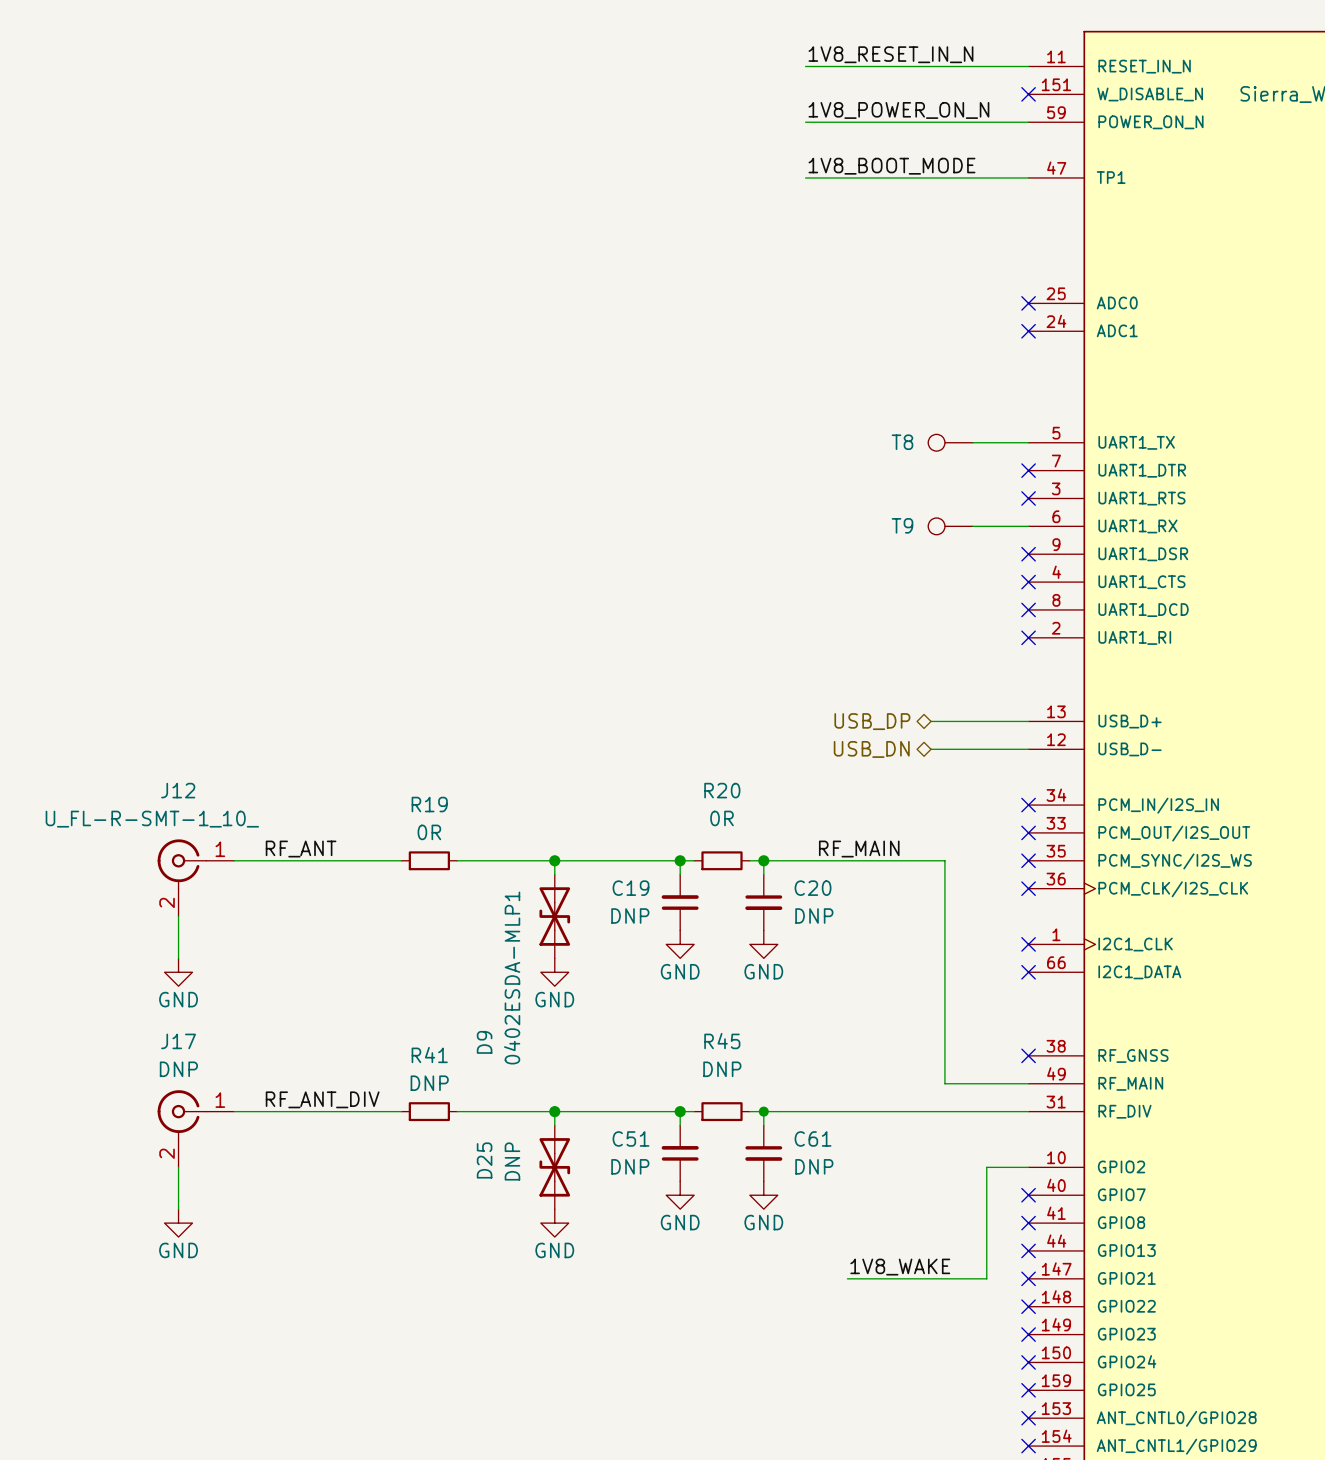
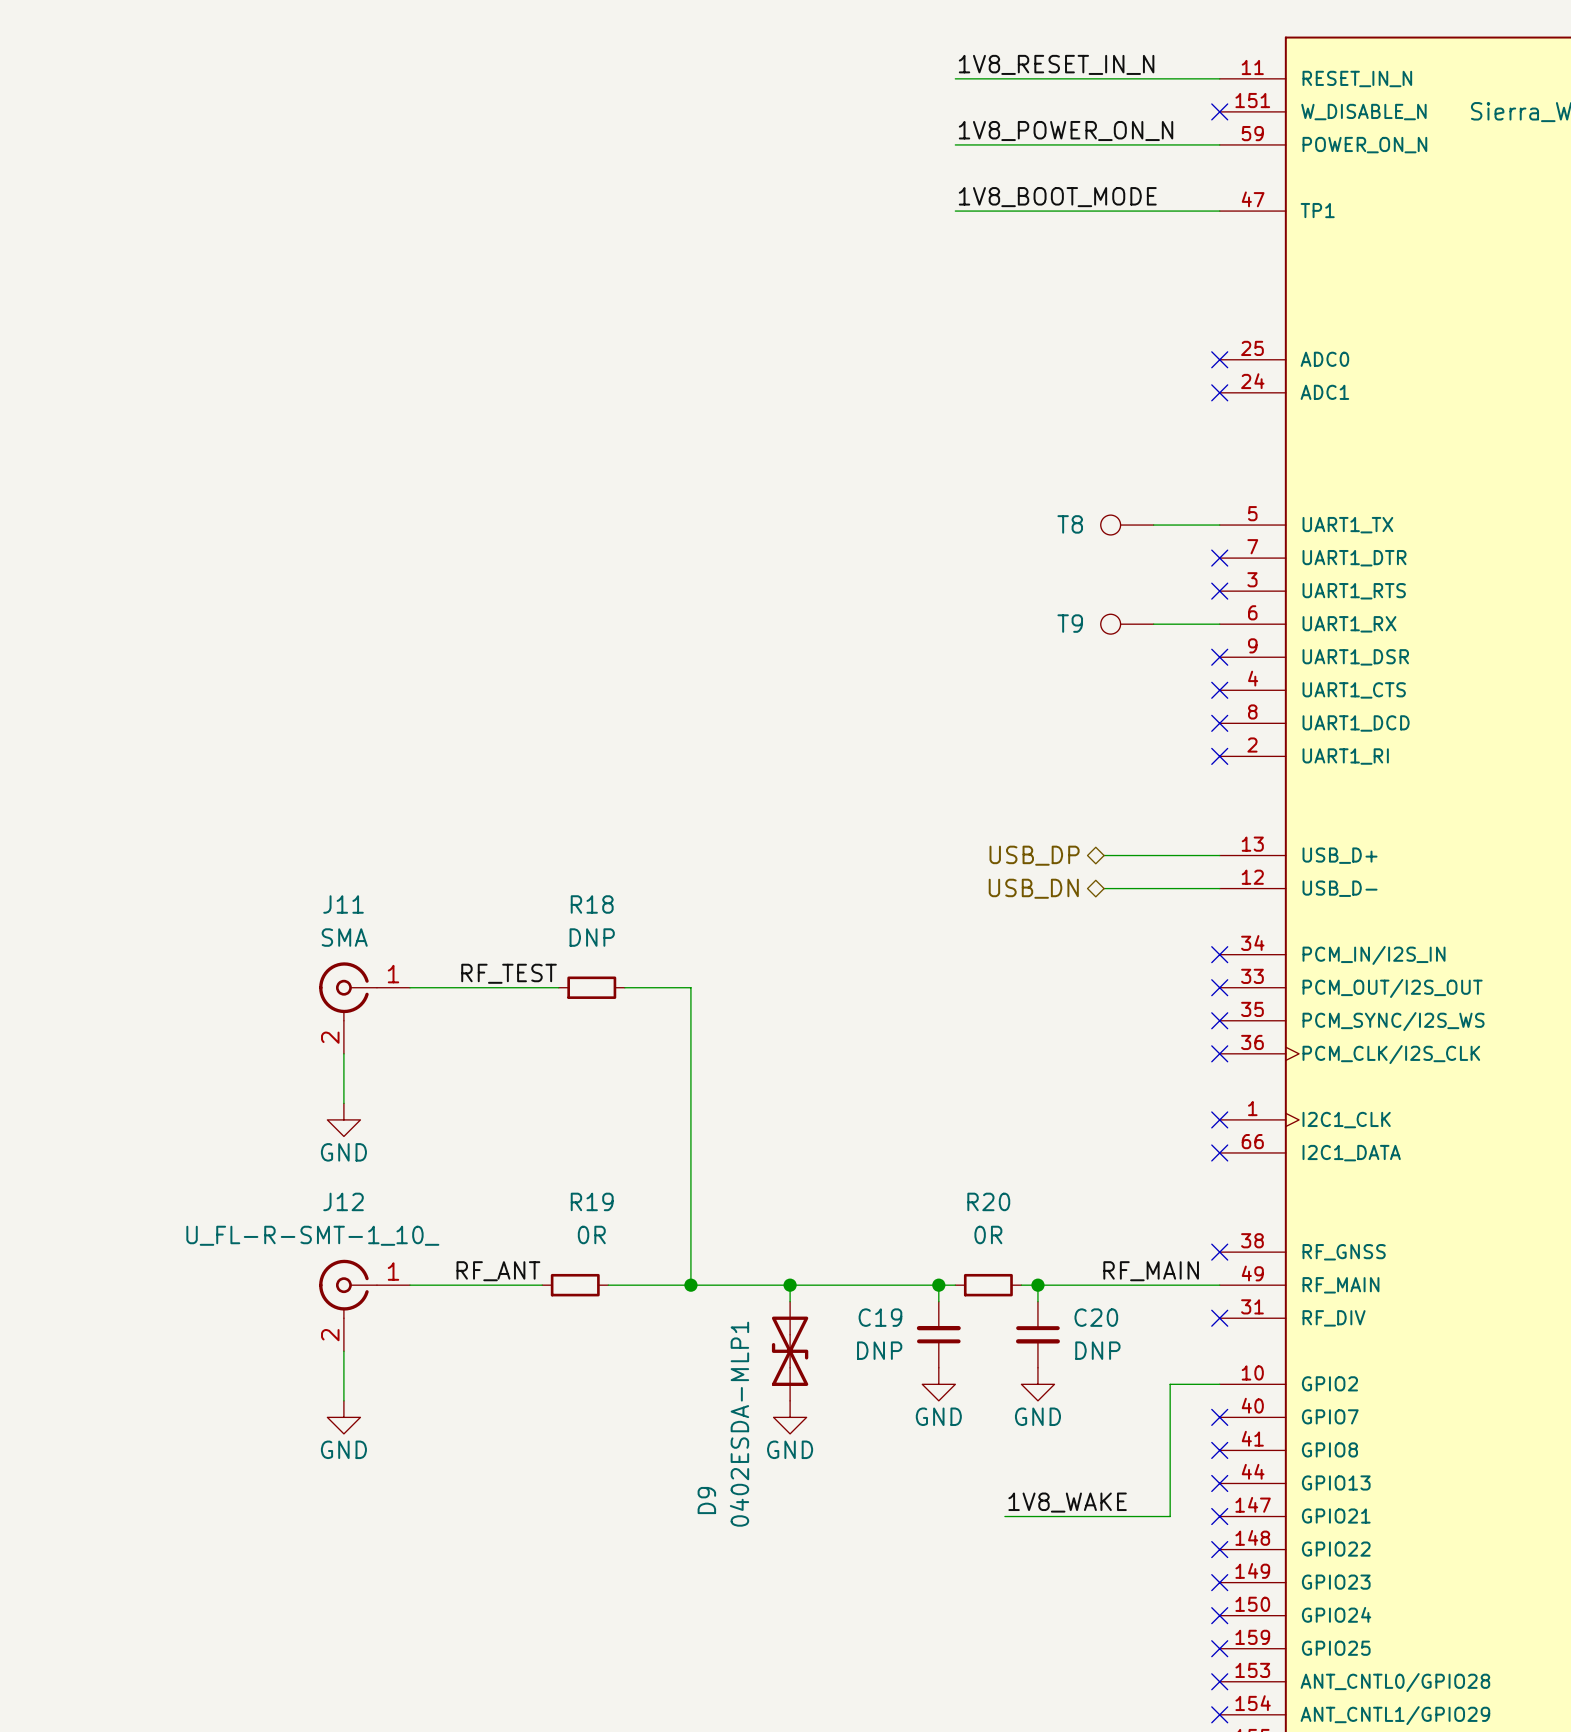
R19 name position: R19 (429, 804) -> R19 (592, 1201)
label: none -> RF_TEST (509, 973)
wire: none -> (410, 987) (558, 987)
R19 value position: 0R (429, 832) -> 0R (591, 1234)
R18: none -> DNP (591, 987)
wire: none -> (624, 987) (690, 987) (690, 1285)
label: RF_ANT (301, 849) -> none
label position: RF_MAIN (859, 849) -> RF_MAIN (1151, 1271)
J11: none -> SMA (364, 1008)
wire: (234, 860) (401, 860) -> none
R19 position: (429, 860) -> (575, 1285)
wire: (457, 860) (694, 860) -> none
wire: (554, 860) (554, 874) -> none
junction: (554, 860) -> none
wire: (680, 860) (680, 874) -> none
junction: (680, 860) -> none
R20 position: (722, 860) -> (988, 1285)
wire: (749, 860) (944, 860) (944, 1083) -> (1021, 1285) (1120, 1285)
wire: (763, 860) (763, 874) -> none
junction: (763, 860) -> none
J12 position: (195, 877) -> (364, 1305)
C19 position: (680, 902) -> (938, 1334)
C20 position: (763, 902) -> (1037, 1334)
wire: (178, 916) (178, 958) -> (343, 1053) (343, 1103)
D9 position: (554, 916) -> (790, 1351)
power symbol: GND (680, 944) -> none
power symbol: GND (763, 944) -> none
power symbol position: GND (178, 972) -> GND (343, 1119)
power symbol: GND (554, 972) -> none
wire: none -> (410, 1285) (542, 1285)
wire: none -> (608, 1285) (955, 1285)
junction: none -> (938, 1285)
junction: none -> (1037, 1285)
label: RF_ANT_DIV (322, 1099) -> RF_ANT (498, 1271)
wire: (234, 1111) (401, 1111) -> none
R41: DNP (429, 1111) -> none
wire: (457, 1111) (694, 1111) -> none
wire: (554, 1111) (554, 1125) -> (790, 1285) (790, 1301)
junction position: (554, 1111) -> (690, 1285)
wire: (680, 1111) (680, 1125) -> (938, 1285) (938, 1301)
junction position: (680, 1111) -> (790, 1285)
R45: DNP (722, 1111) -> none
wire: (749, 1111) (1028, 1111) -> none
wire: (763, 1111) (763, 1125) -> (1037, 1285) (1037, 1301)
junction: (763, 1111) -> none
no-connect mark: none -> (1219, 1318)
J17: DNP (195, 1128) -> none
C51: DNP (680, 1153) -> none
C61: DNP (763, 1153) -> none
wire: (178, 1167) (178, 1209) -> (343, 1351) (343, 1400)
D25: DNP (554, 1167) -> none
power symbol: none -> GND (1037, 1384)
power symbol position: GND (680, 1195) -> GND (790, 1417)
power symbol position: GND (763, 1195) -> GND (938, 1384)
power symbol position: GND (178, 1223) -> GND (343, 1417)
power symbol: GND (554, 1223) -> none

